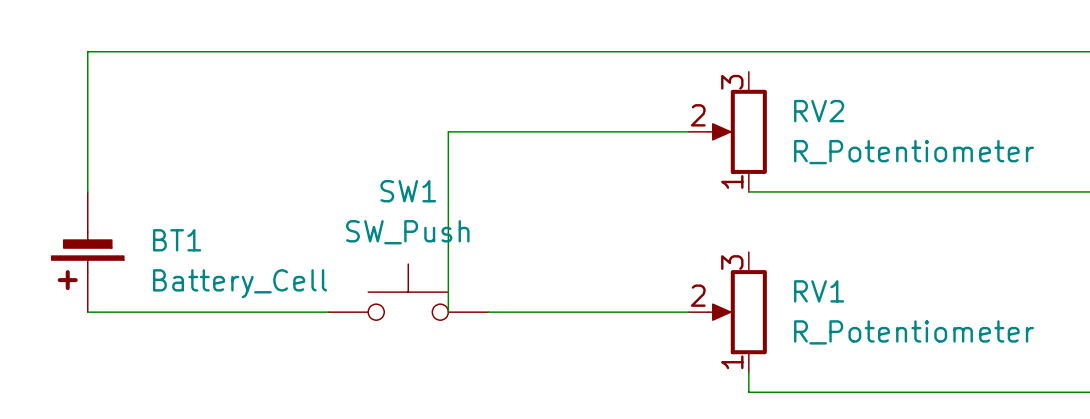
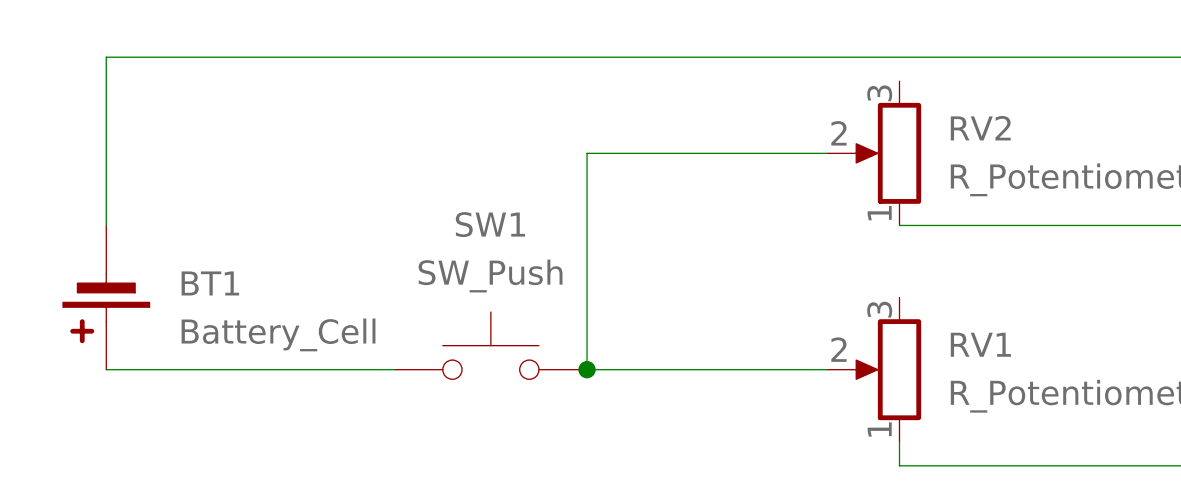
wire: (488, 131) (448, 131) (448, 312) -> (587, 153) (587, 369)
junction: none -> (587, 369)

